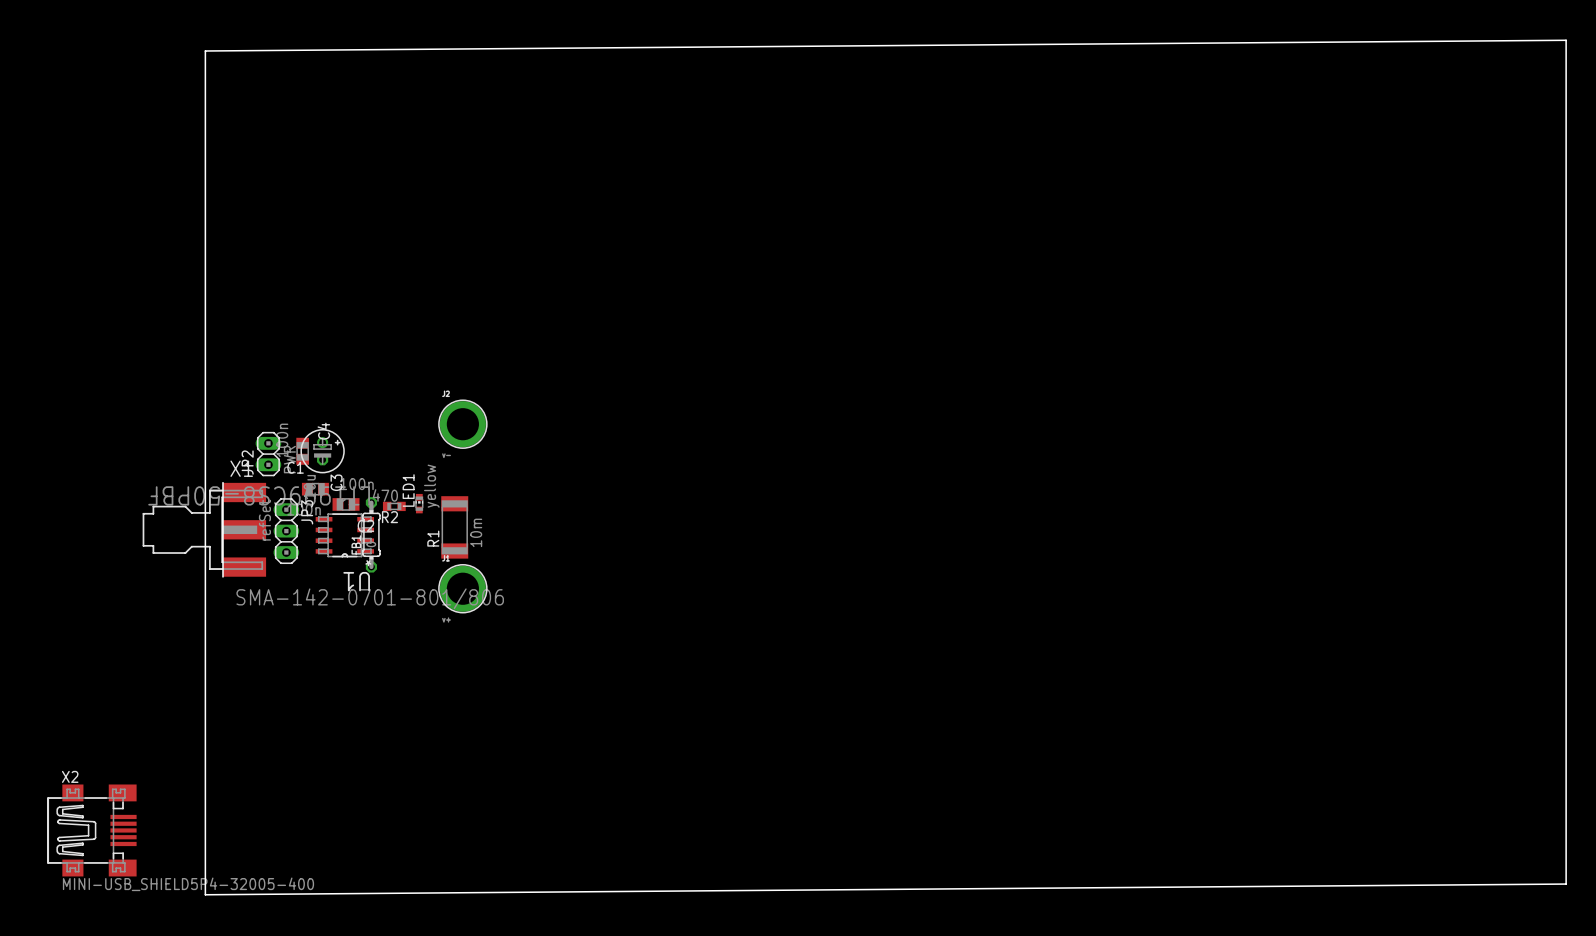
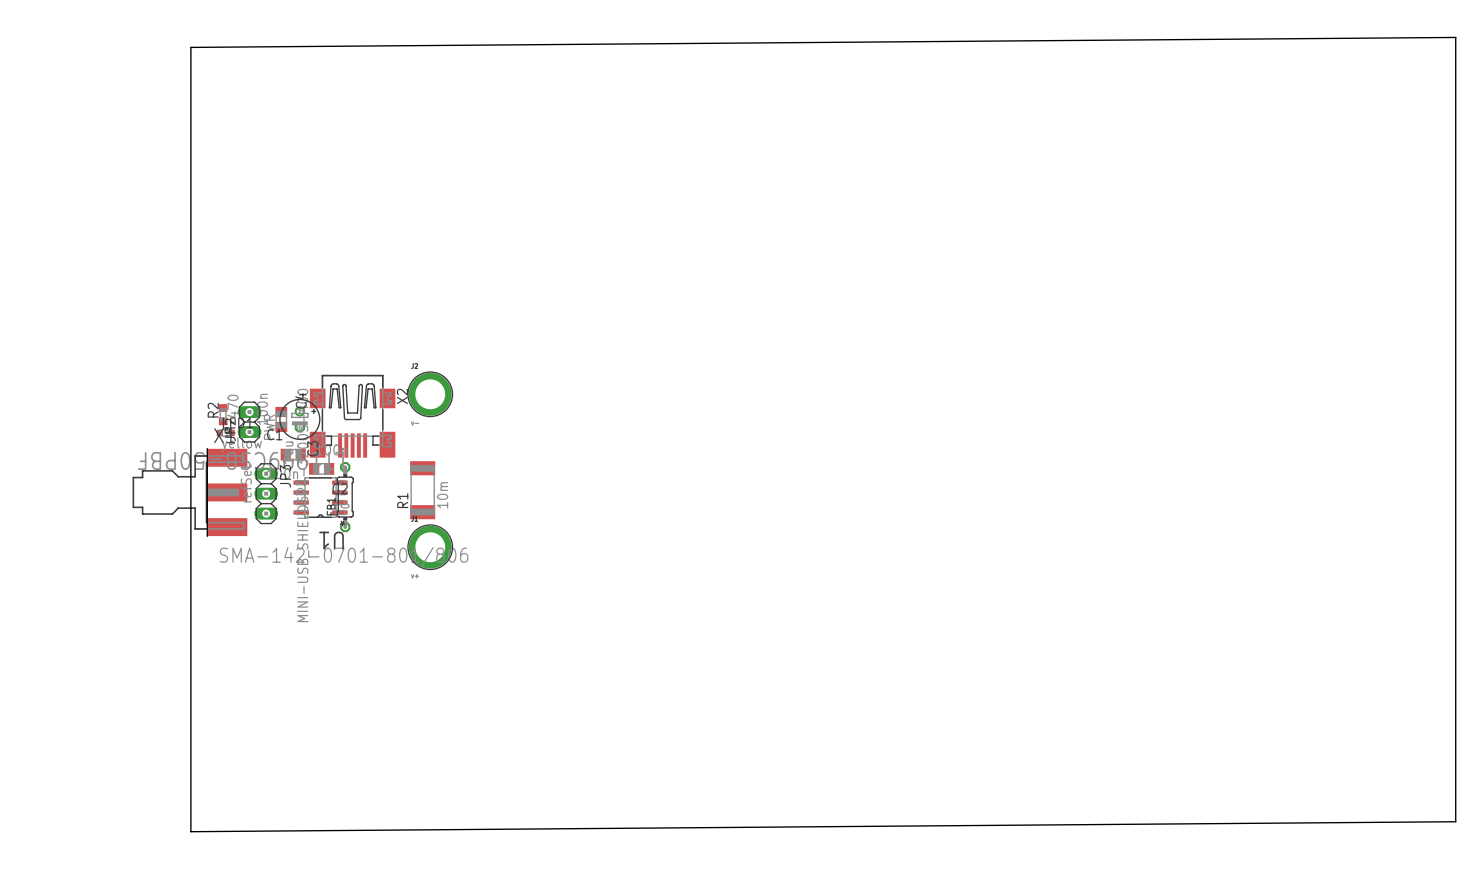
LED1 rotation: 0° (419, 503) -> 90° clockwise (225, 432)
LED1 position: (419, 503) -> (225, 432)
R2 rotation: 0° (394, 506) -> 90° clockwise (223, 414)
R2 position: (394, 506) -> (223, 414)
X2 rotation: 0° (92, 830) -> 90° clockwise (352, 416)
X2 position: (92, 830) -> (352, 416)

